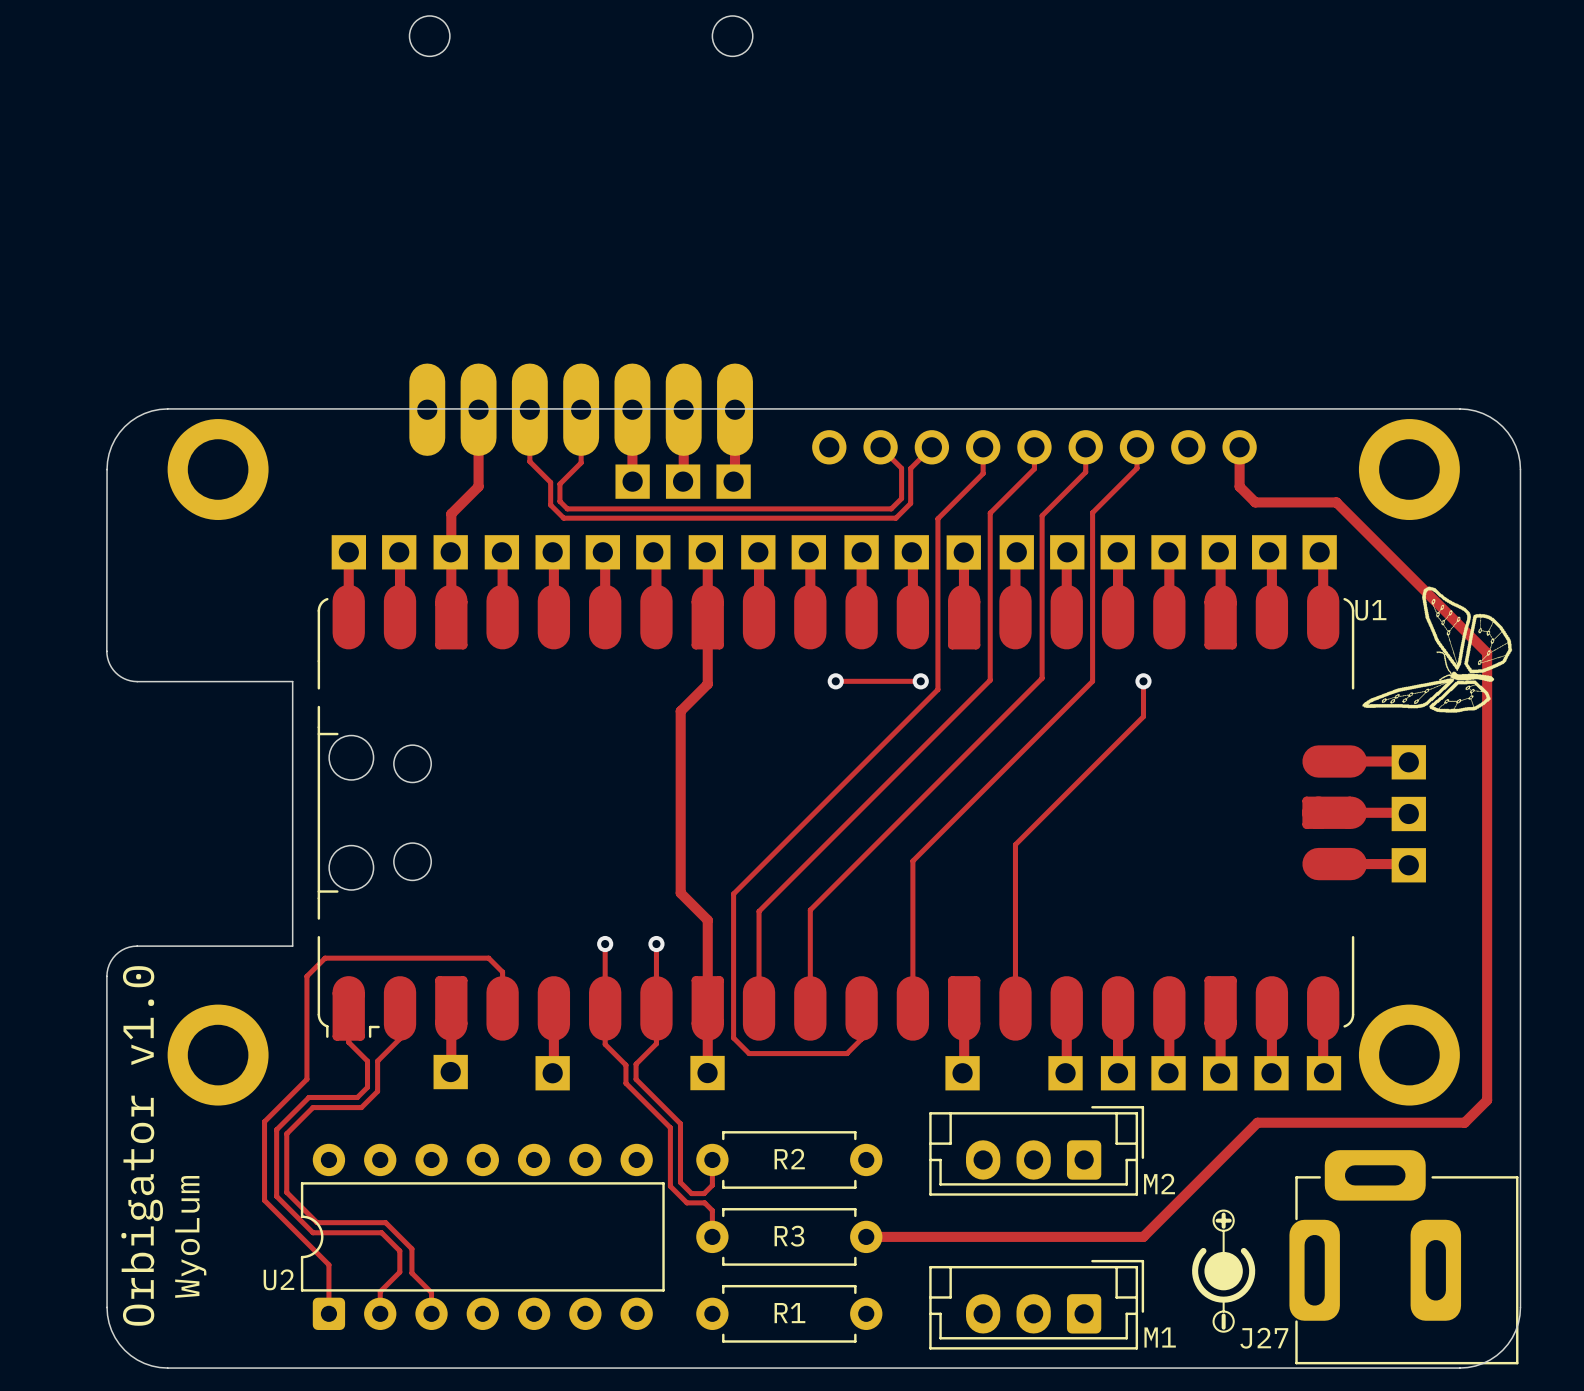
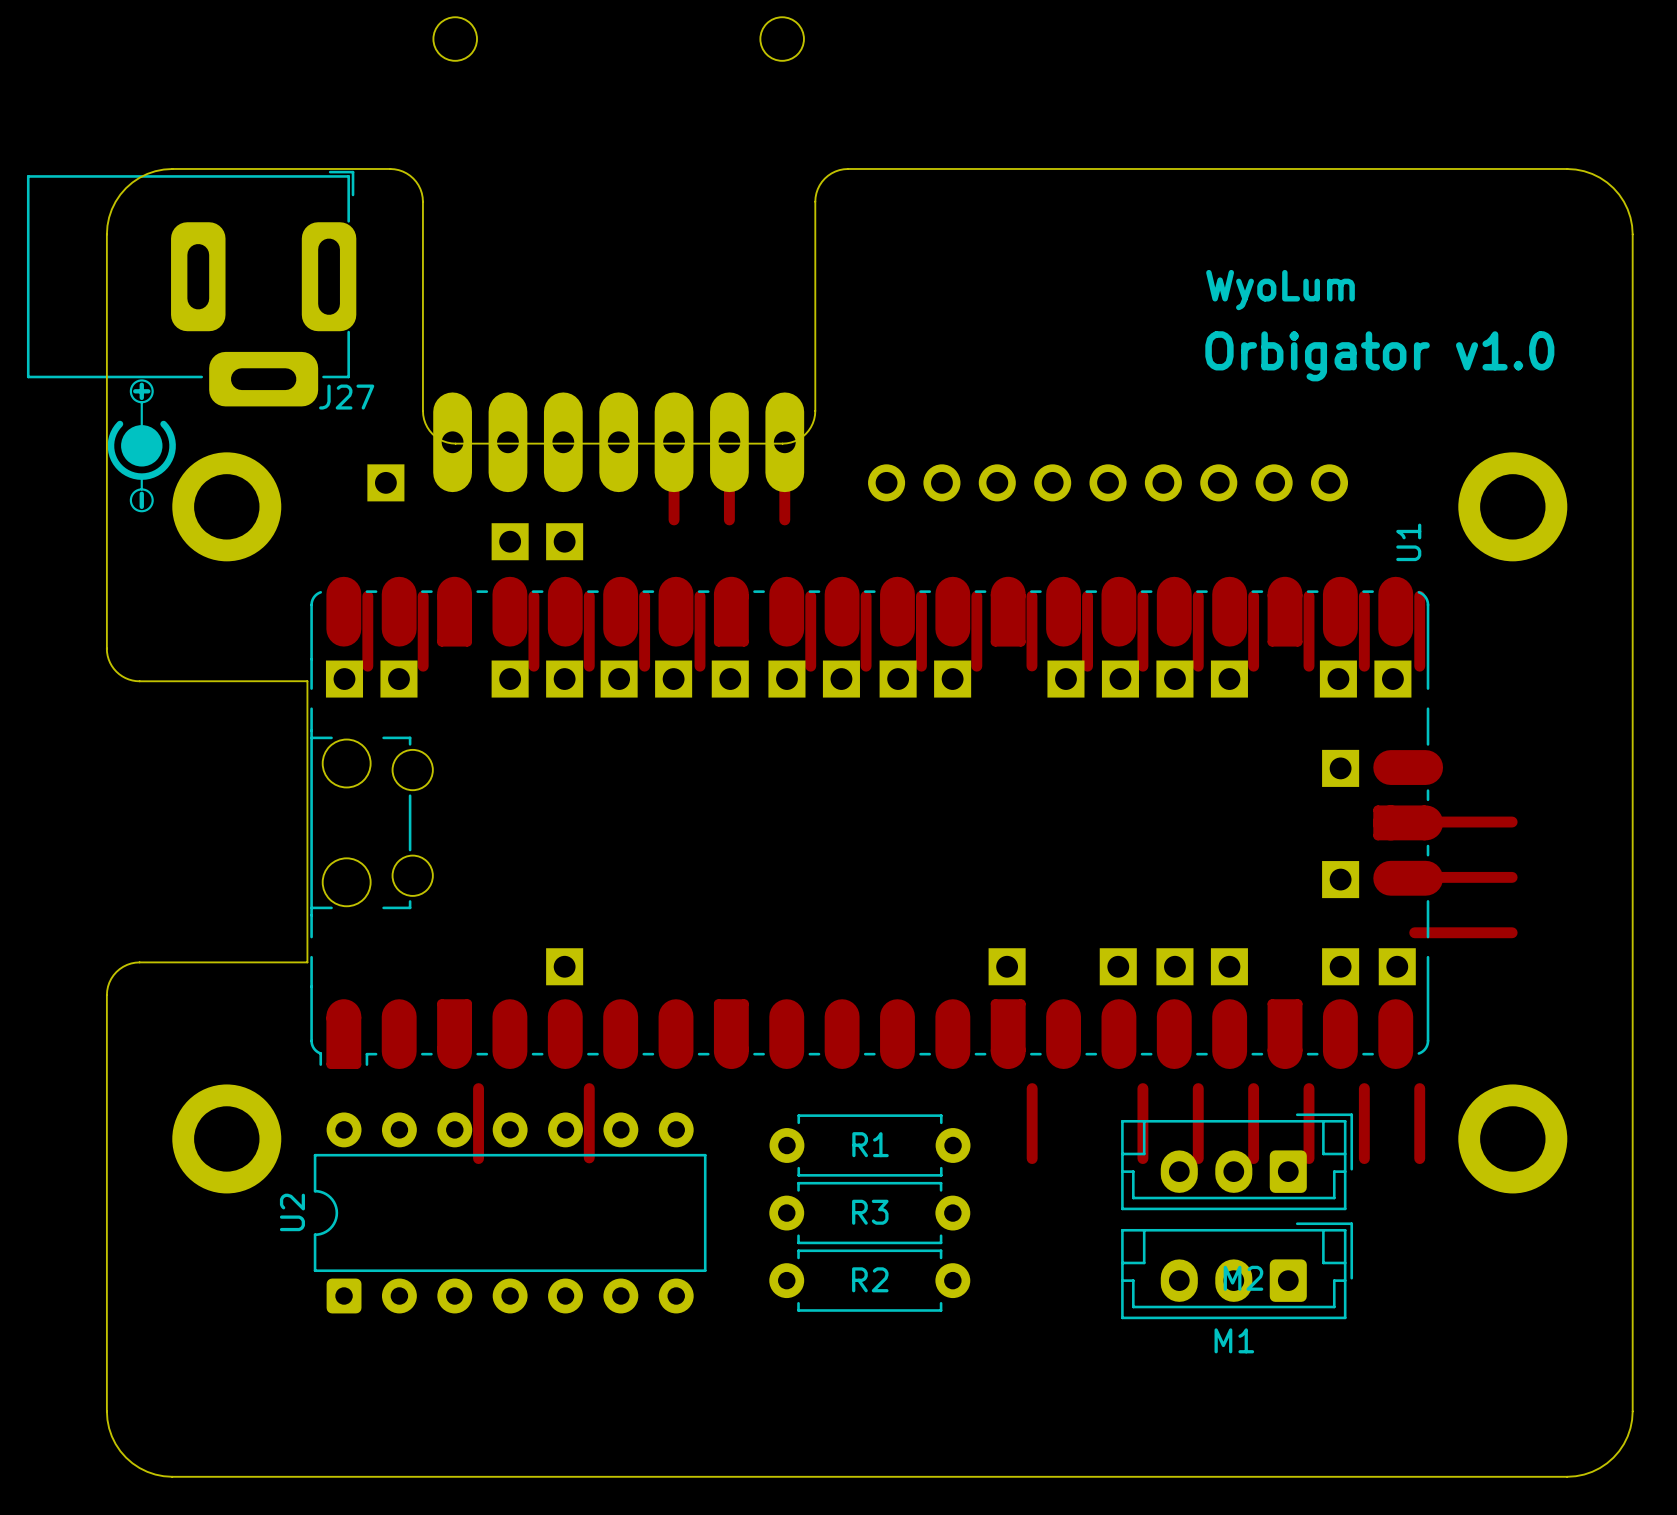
text: none -> WyoLum (1280, 290)
text: none -> Orbigator v1.0 (1379, 356)
drawing: none -> [107, 379, 176, 513]
track: (529, 411) (529, 461) (550, 482) (550, 505) (563, 518) (895, 518) (910, 503) (910, 468) (931, 447) -> none
track: (581, 411) (581, 462) (559, 484) (559, 501) (567, 508) (891, 508) (901, 498) (901, 468) (880, 447) -> none
track: (478, 413) (478, 486) (451, 513) (451, 617) -> none
part: none -> (385, 482)
track: (983, 447) (983, 473) (937, 518) (937, 689) (733, 893) (733, 1038) (749, 1053) (847, 1053) (861, 1039) (861, 1008) -> none
track: (1034, 447) (1034, 468) (990, 513) (990, 680) (759, 911) (759, 1008) -> none
track: (1085, 447) (1085, 472) (1042, 515) (1042, 678) (810, 910) (810, 1008) -> none
track: (1137, 447) (1137, 468) (1092, 512) (1092, 681) (912, 861) (912, 1008) -> none
track: (1239, 447) (1239, 486) (1255, 502) (1336, 502) (1487, 653) (1487, 1100) (1464, 1122) (1257, 1122) (1143, 1236) (866, 1236) -> none
board edge: (1520, 469) (1515, 446) (1502, 426) (1483, 413) (1459, 408) (159, 409) (137, 417) (124, 426) (115, 439) (109, 453) (107, 469) (106, 651) -> (1632, 506) (1632, 225) (1627, 209) (1613, 188) (1599, 177) (1584, 171) (1567, 168) (847, 168) (835, 171) (822, 181) (815, 197) (815, 415) (810, 427) (802, 436) (791, 442) (782, 443) (455, 443) (443, 441) (429, 430) (423, 415) (422, 201) (418, 185) (410, 175) (398, 170) (390, 168) (172, 168) (155, 171) (139, 177) (126, 188) (115, 201) (107, 225) (107, 655) (111, 665) (119, 674) (135, 681) (307, 681) (307, 962) (135, 962) (119, 969) (109, 982) (106, 995) (106, 1411)
part: (632, 481) -> none
part: (683, 481) -> none
part: (733, 481) -> none
part: none -> (510, 541)
part: none -> (564, 541)
part: (348, 552) -> none
part: (399, 552) -> none
part: (450, 552) -> none
part: (501, 552) -> none
part: (552, 552) -> none
part: (602, 552) -> none
part: (653, 552) -> none
part: (705, 552) -> none
track: (707, 552) (707, 684) (680, 711) (680, 893) (707, 920) (707, 1073) -> none
part: (758, 552) -> none
part: (808, 552) -> none
part: (861, 552) -> none
part: (911, 552) -> none
part: (963, 552) -> none
part: (1016, 552) -> none
part: (1067, 552) -> none
part: (1117, 552) -> none
part: (1168, 552) -> none
part: (1218, 552) -> none
part: (1269, 552) -> none
part: (1319, 552) -> none
U1 footprint: [317, 584, 1368, 1041] -> [310, 576, 1444, 1069]
drawing: [1362, 586, 1513, 713] -> none
U1 name position: U1 (1370, 610) -> U1 (1408, 542)
part: none -> (344, 679)
part: none -> (398, 679)
part: none -> (510, 679)
part: none -> (564, 679)
part: none -> (619, 679)
part: none -> (673, 679)
part: none -> (730, 679)
part: none -> (786, 679)
part: none -> (841, 679)
part: none -> (898, 679)
part: none -> (952, 679)
part: none -> (1065, 679)
part: none -> (1120, 679)
part: none -> (1174, 679)
part: none -> (1229, 679)
part: none -> (1338, 679)
part: none -> (1392, 679)
board edge: (106, 651) (108, 661) (113, 670) (121, 676) (133, 681) (292, 681) (292, 946) (133, 946) (118, 952) (113, 957) (107, 968) (107, 1307) -> none
track: (835, 681) (920, 681) -> none
via: (835, 681) -> none
via: (920, 681) -> none
track: (1143, 681) (1143, 716) (1015, 844) (1015, 1008) -> none
via: (1143, 681) -> none
part: none -> (1340, 768)
part: (1408, 762) -> none
part: (1408, 813) -> none
part: none -> (1340, 879)
part: (1408, 865) -> none
part: none -> (564, 966)
part: none -> (1007, 966)
part: none -> (1118, 966)
part: none -> (1174, 966)
part: none -> (1229, 966)
part: none -> (1340, 966)
part: none -> (1397, 966)
track: (605, 944) (605, 1044) (625, 1065) (625, 1083) (670, 1127) (670, 1186) (686, 1202) (704, 1202) (712, 1210) (712, 1236) -> none
via: (605, 944) -> none
track: (656, 944) (656, 1043) (636, 1064) (636, 1079) (680, 1123) (680, 1182) (691, 1193) (704, 1193) (712, 1185) (712, 1159) -> none
via: (656, 944) -> none
track: (348, 1008) (348, 1042) (367, 1061) (367, 1087) (357, 1097) (308, 1097) (276, 1129) (276, 1196) (312, 1232) (381, 1232) (399, 1250) (399, 1272) (380, 1291) (380, 1313) -> none
track: (400, 1008) (400, 1038) (377, 1061) (377, 1091) (361, 1107) (312, 1107) (286, 1133) (286, 1192) (317, 1222) (385, 1222) (411, 1248) (411, 1273) (431, 1292) (431, 1313) -> none
track: (502, 1008) (502, 972) (488, 958) (325, 958) (306, 976) (306, 1079) (264, 1121) (264, 1200) (328, 1264) (328, 1313) -> none
part: (450, 1072) -> none
part: (552, 1073) -> none
part: (707, 1073) -> none
part: (962, 1073) -> none
part: (1065, 1073) -> none
part: (1118, 1073) -> none
part: (1168, 1073) -> none
part: (1220, 1073) -> none
part: (1271, 1073) -> none
part: (1324, 1073) -> none
text: Orbigator v1.0 (142, 1145) -> none
M2 position: (1036, 1150) -> (1237, 1161)
J27 footprint: [1289, 1150, 1519, 1365] -> [26, 170, 357, 407]
R2 position: (789, 1159) -> (869, 1280)
drawing: [1192, 1209, 1256, 1333] -> none
text: WyoLum (190, 1236) -> none
U2 position: (482, 1236) -> (510, 1212)
R3 position: (789, 1236) -> (869, 1213)
U2 name rotation: 0° (278, 1279) -> 90° counterclockwise (292, 1212)
M1 position: (1036, 1304) -> (1237, 1270)
R1 position: (789, 1313) -> (870, 1145)
M1 name position: M1 (1160, 1337) -> M1 (1234, 1340)
J27 name position: J27 (1264, 1338) -> J27 (346, 397)

